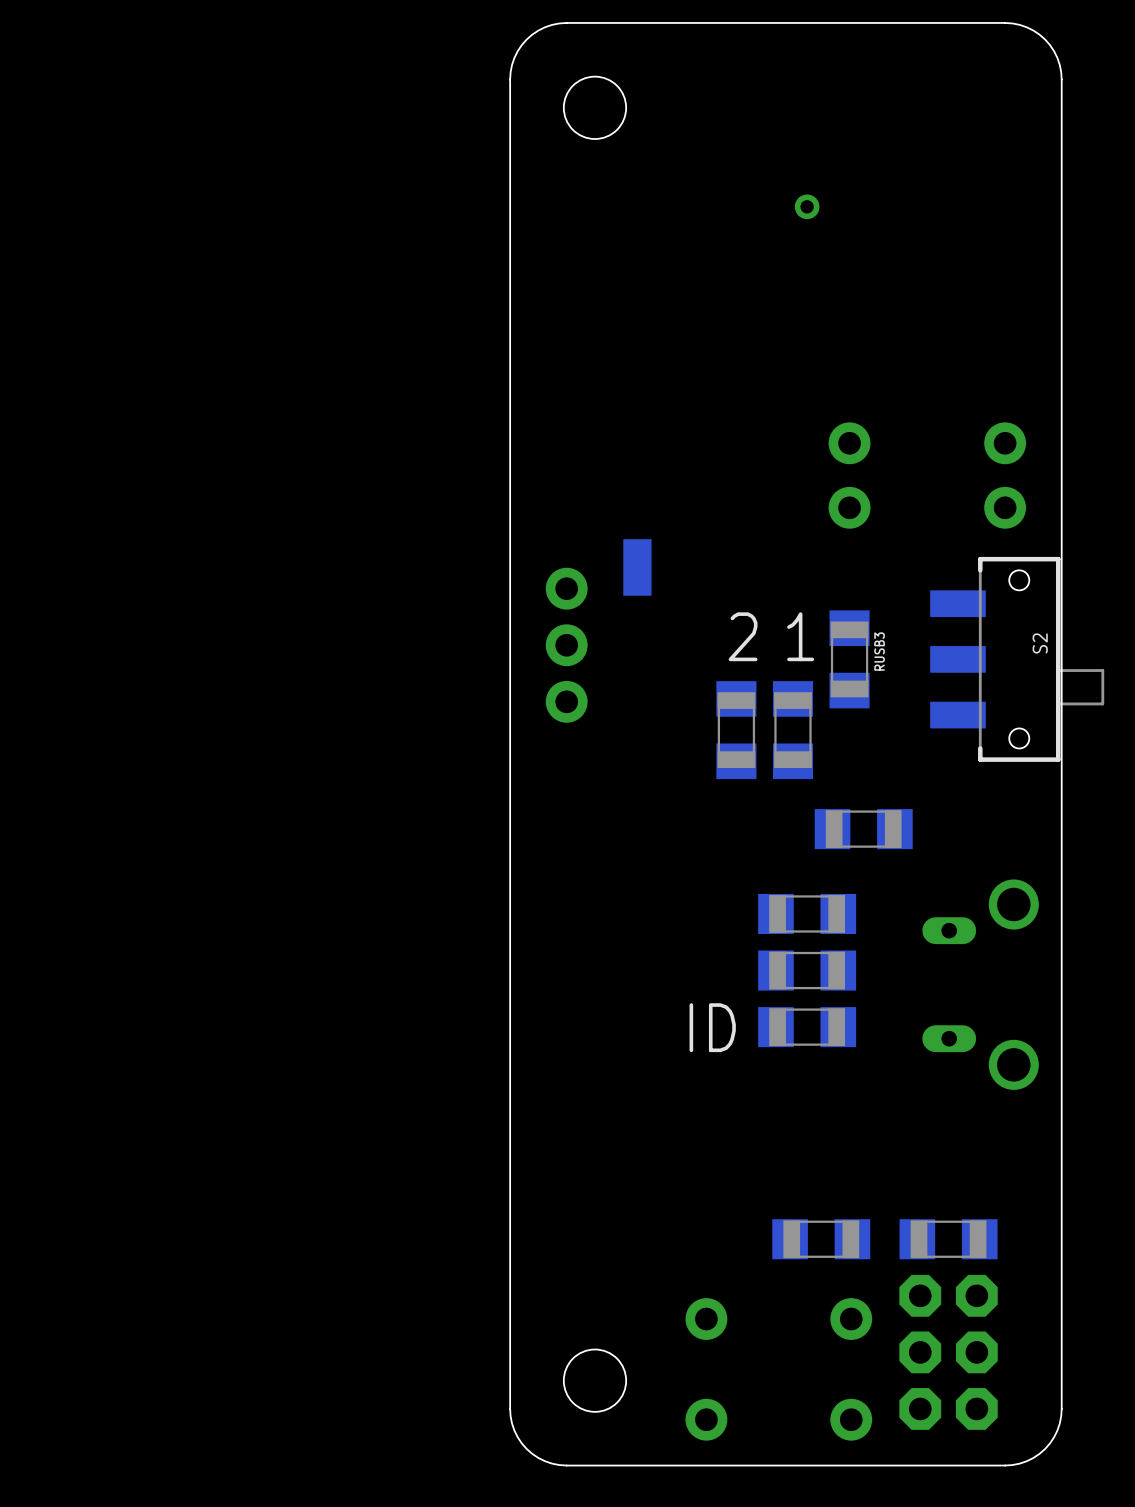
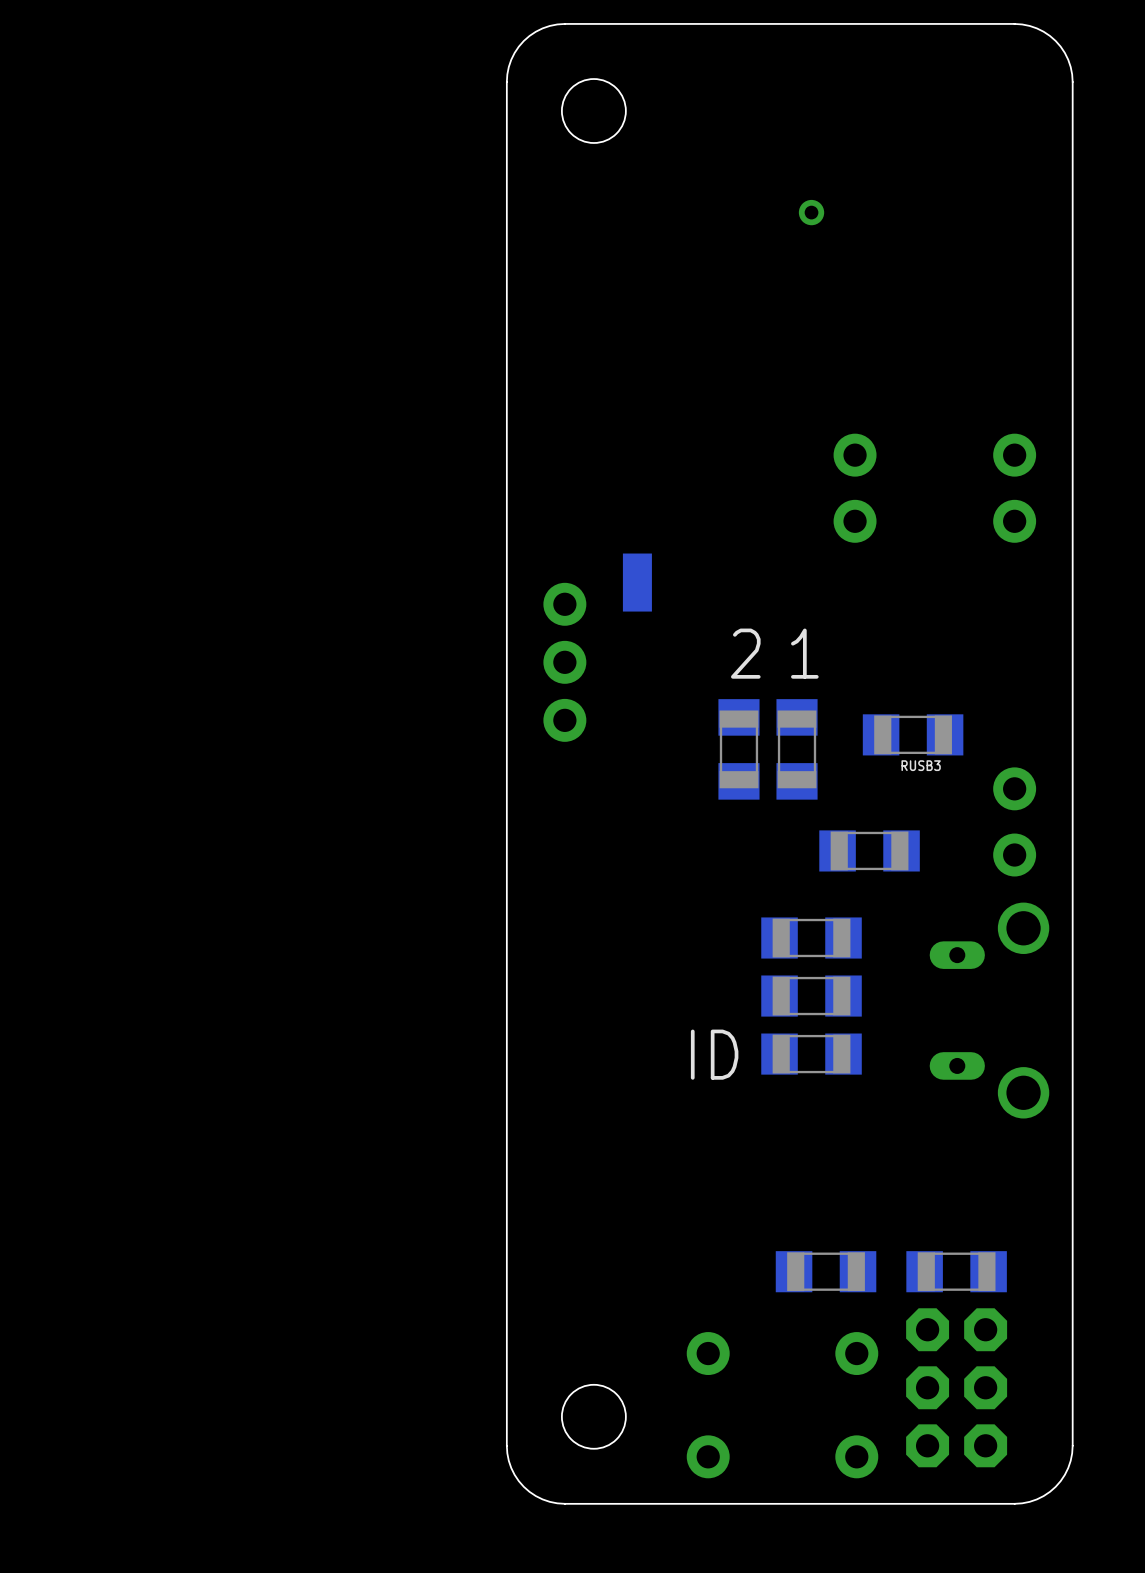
RUSB3 rotation: 0° (849, 659) -> 90° clockwise (913, 734)
RUSB3 position: (849, 659) -> (913, 734)
S2: (1017, 659) -> none
part: none -> (1014, 821)

